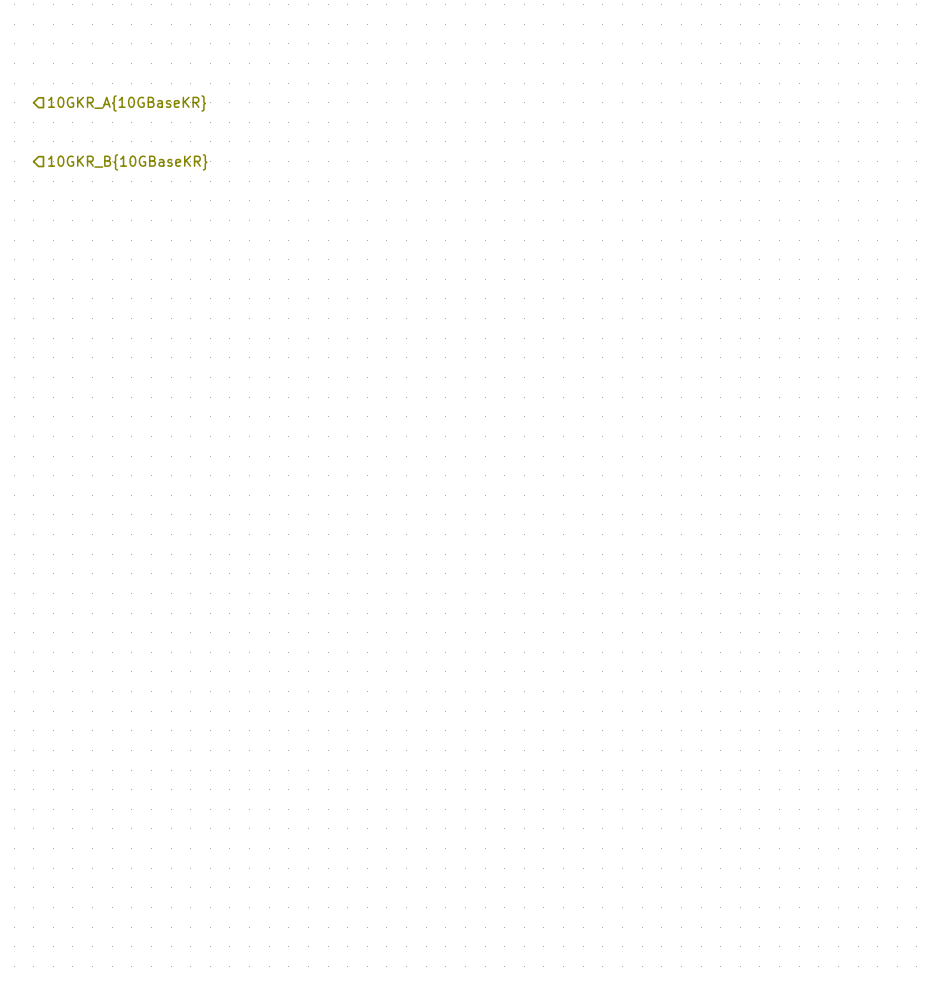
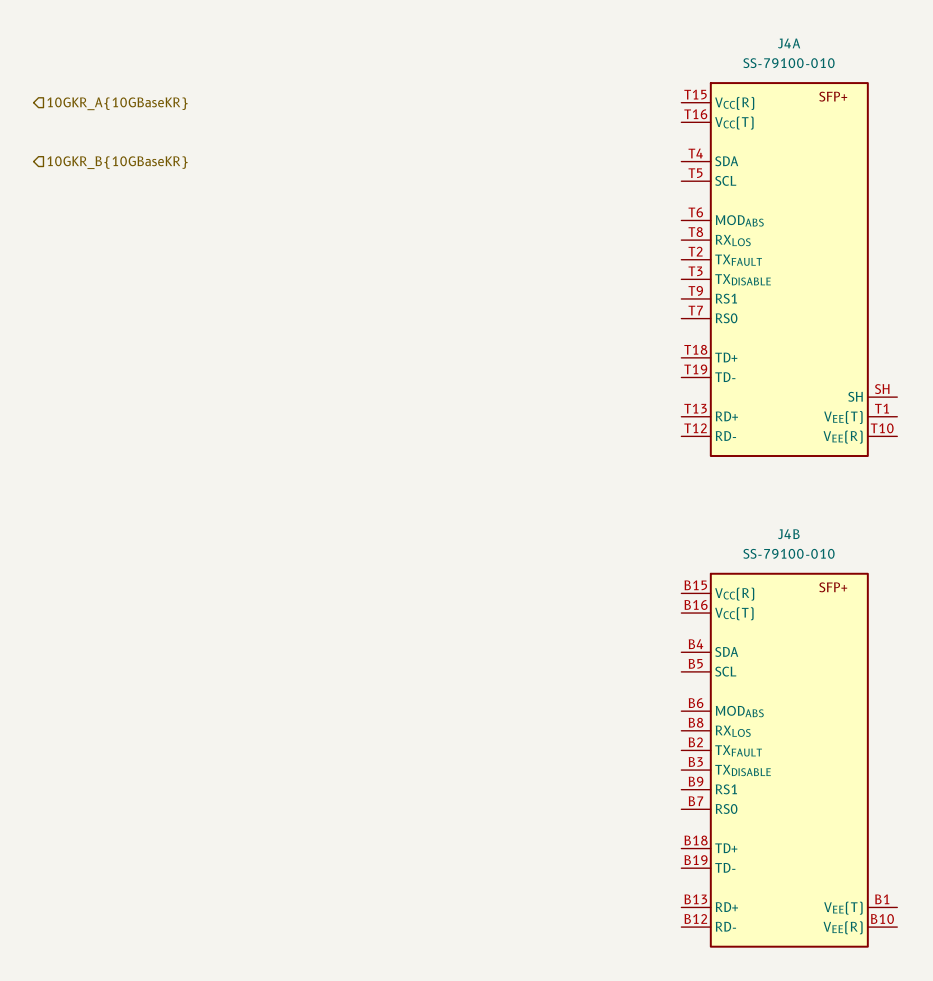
J4A: none -> (789, 269)
J4B: none -> (789, 760)

